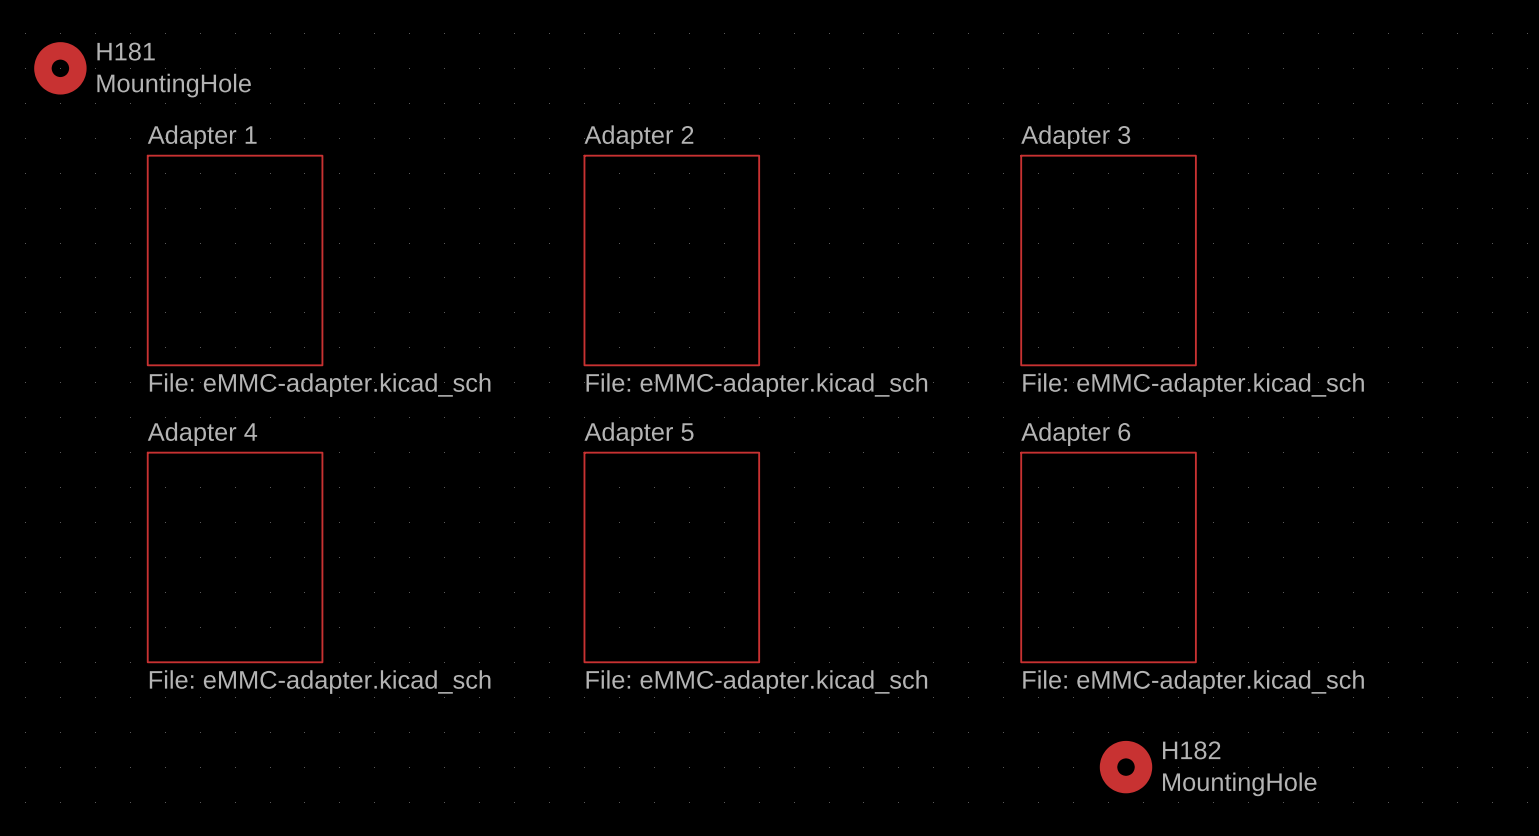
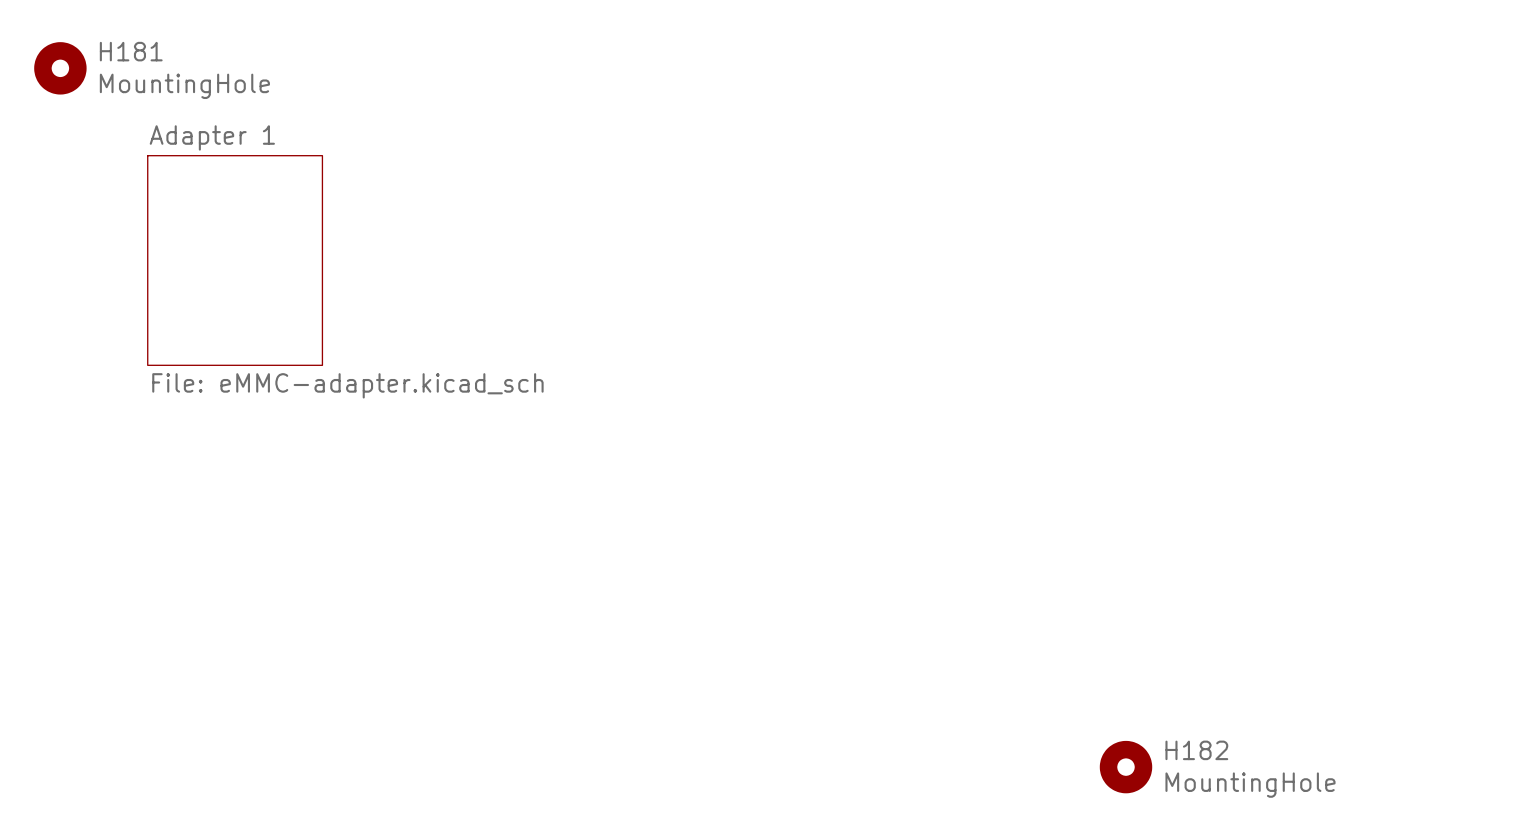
sheet Adapter 2: File: eMMC-adapter.kicad_sch (671, 260) -> none
sheet Adapter 3: File: eMMC-adapter.kicad_sch (1108, 260) -> none
sheet Adapter 4: File: eMMC-adapter.kicad_sch (235, 557) -> none
sheet Adapter 5: File: eMMC-adapter.kicad_sch (671, 557) -> none
sheet Adapter 6: File: eMMC-adapter.kicad_sch (1108, 557) -> none

